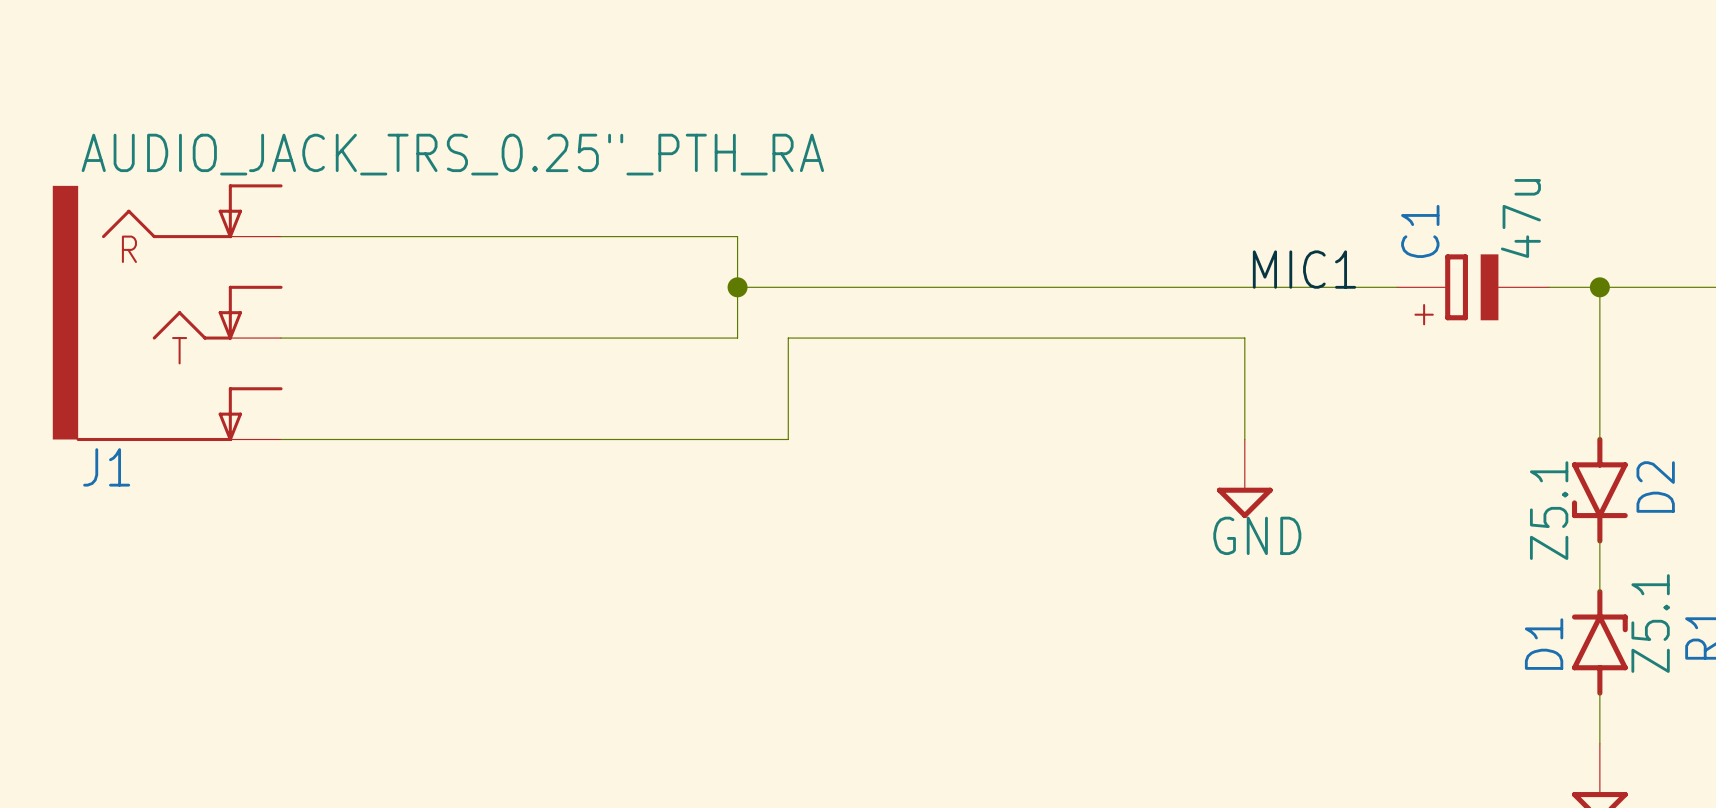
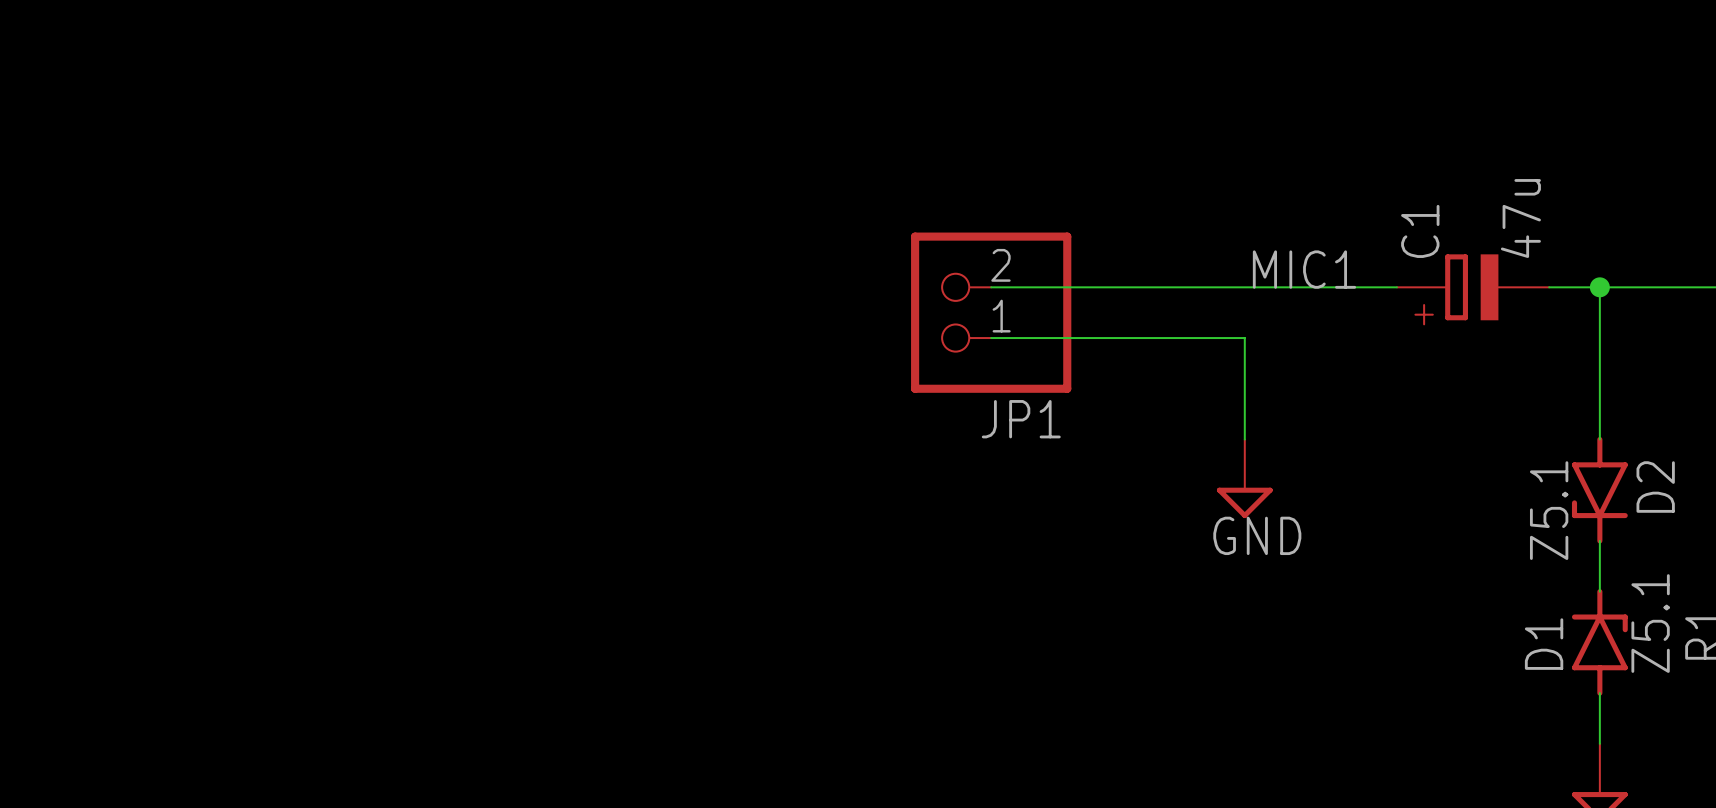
wire: (281, 236) (737, 236) (737, 338) (281, 338) -> none
wire: (737, 287) (991, 287) -> none
junction: (737, 287) -> none
J1: AUDIO_JACK_TRS_0.25"_PTH_RA (167, 312) -> none
JP1: none -> (991, 312)
wire: (991, 338) (788, 338) (788, 439) (281, 439) -> none

